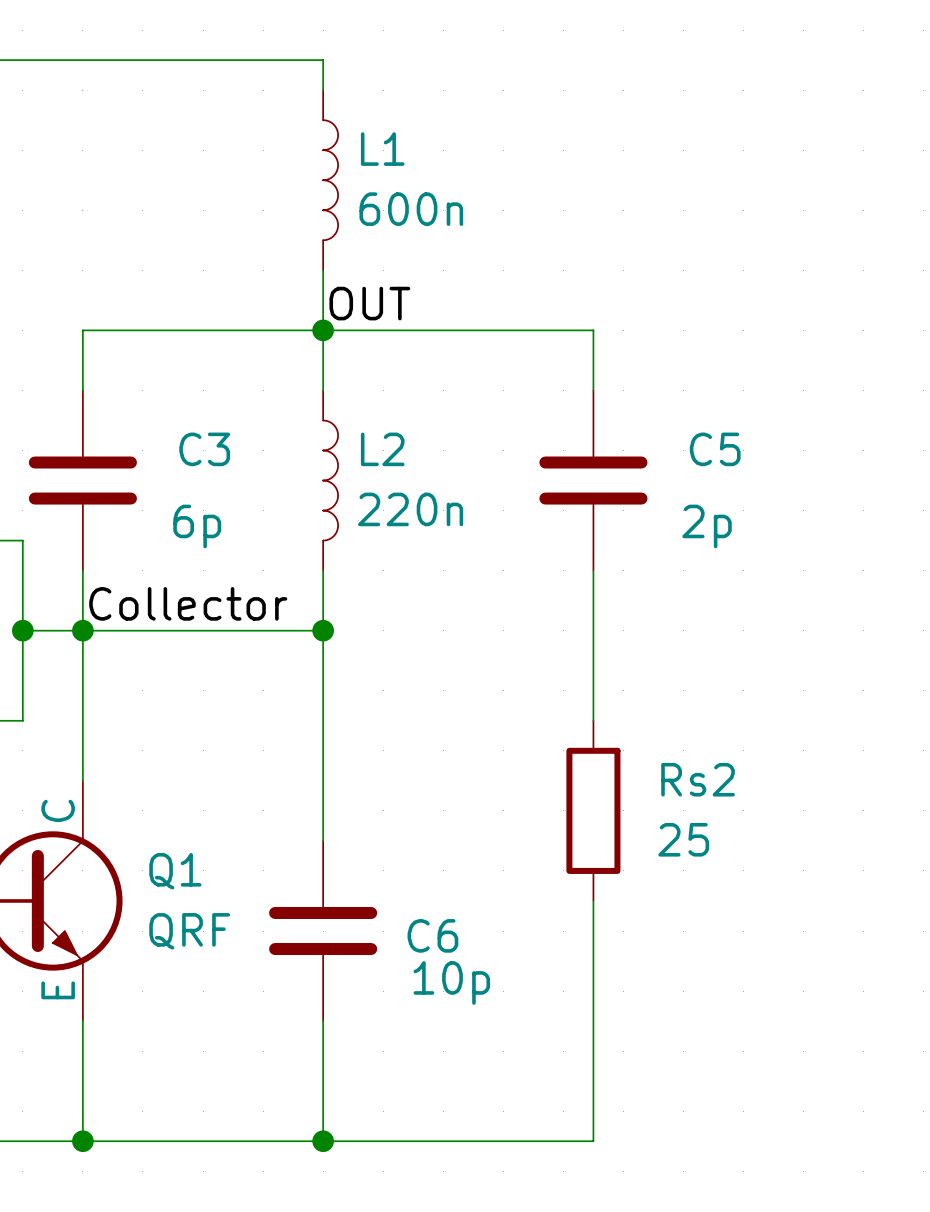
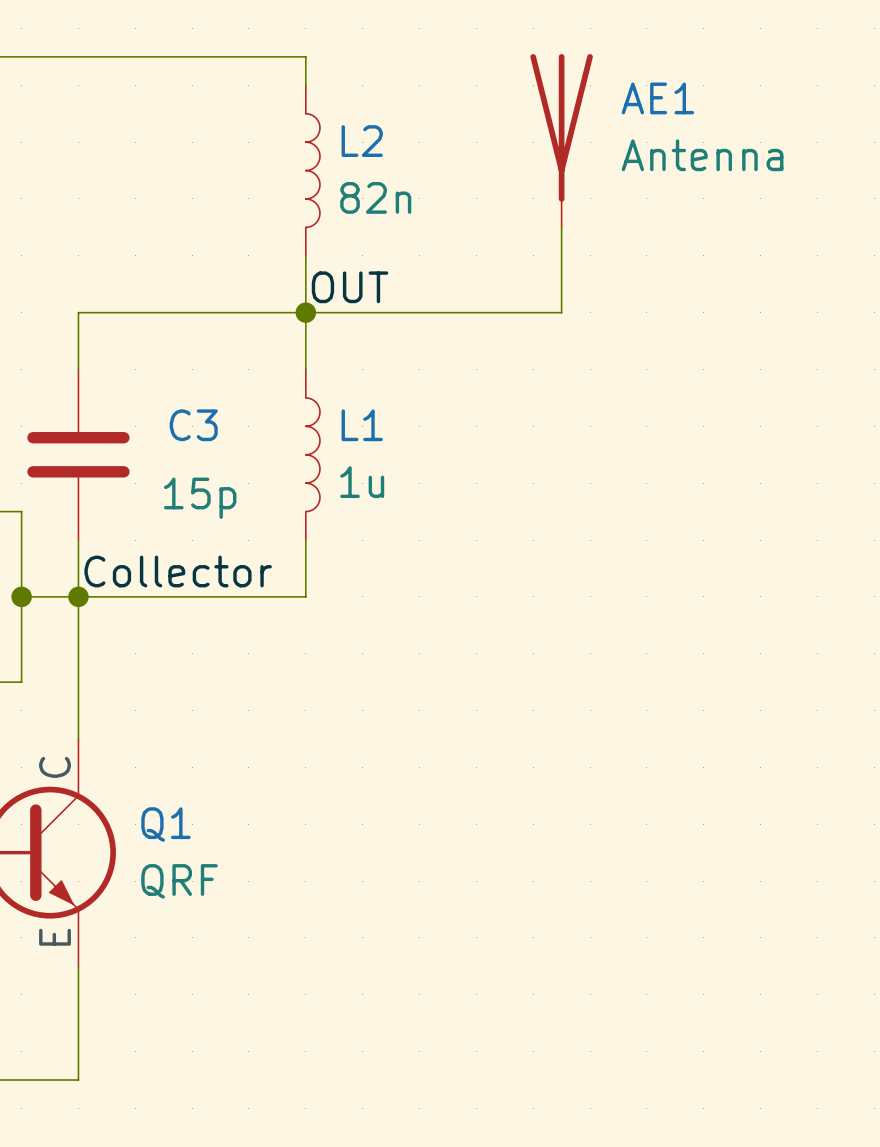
AE1: none -> Antenna (561, 140)
L1 name: L1 (382, 149) -> L2 (362, 141)
L1 value: 600n (411, 209) -> 82n (375, 197)
wire: (593, 330) (593, 390) -> (561, 312) (561, 227)
L2 name: L2 (382, 449) -> L1 (362, 425)
C5: 2p (593, 480) -> none
L2 value: 220n (410, 509) -> 1u (362, 482)
C3 value: 6p (197, 526) -> 15p (200, 498)
wire: (593, 570) (593, 720) -> none
wire: (323, 630) (323, 840) -> none
junction: (323, 630) -> none
Rs2: 25 (593, 810) -> none
wire: (593, 900) (593, 1141) (82, 1141) -> none
C6: 10p (323, 931) -> none
wire: (323, 1021) (323, 1141) -> none
junction: (82, 1141) -> none
junction: (323, 1141) -> none

